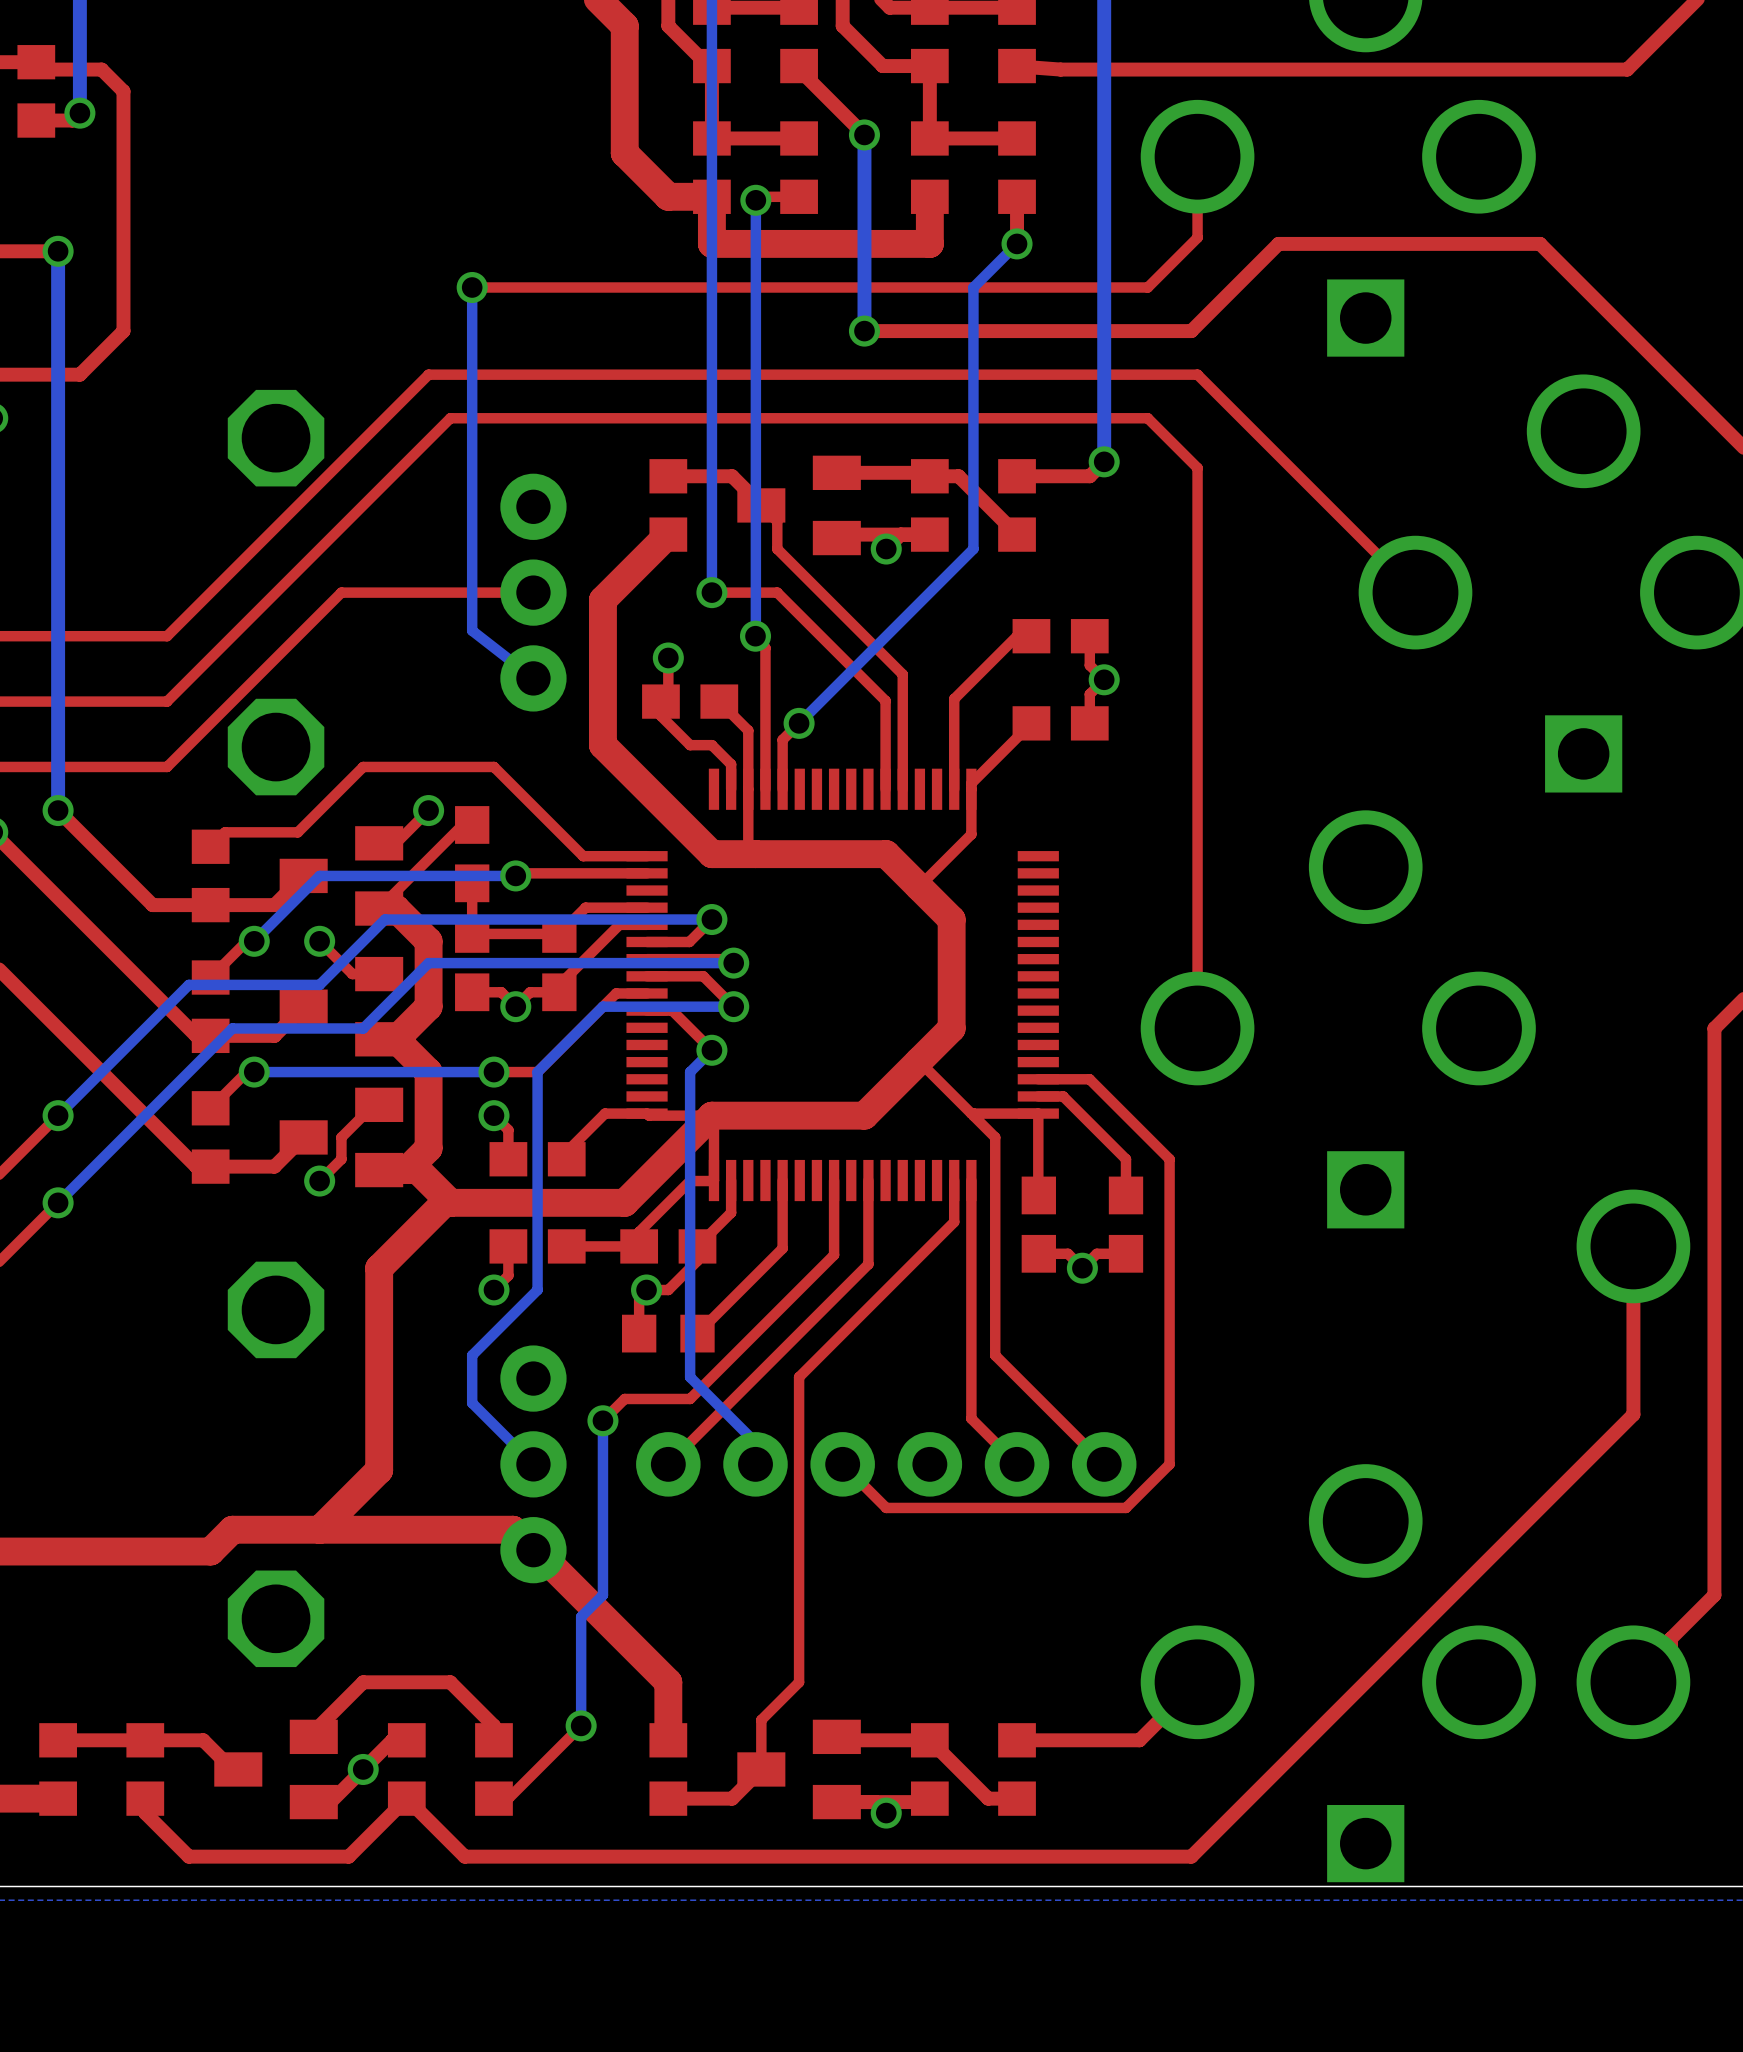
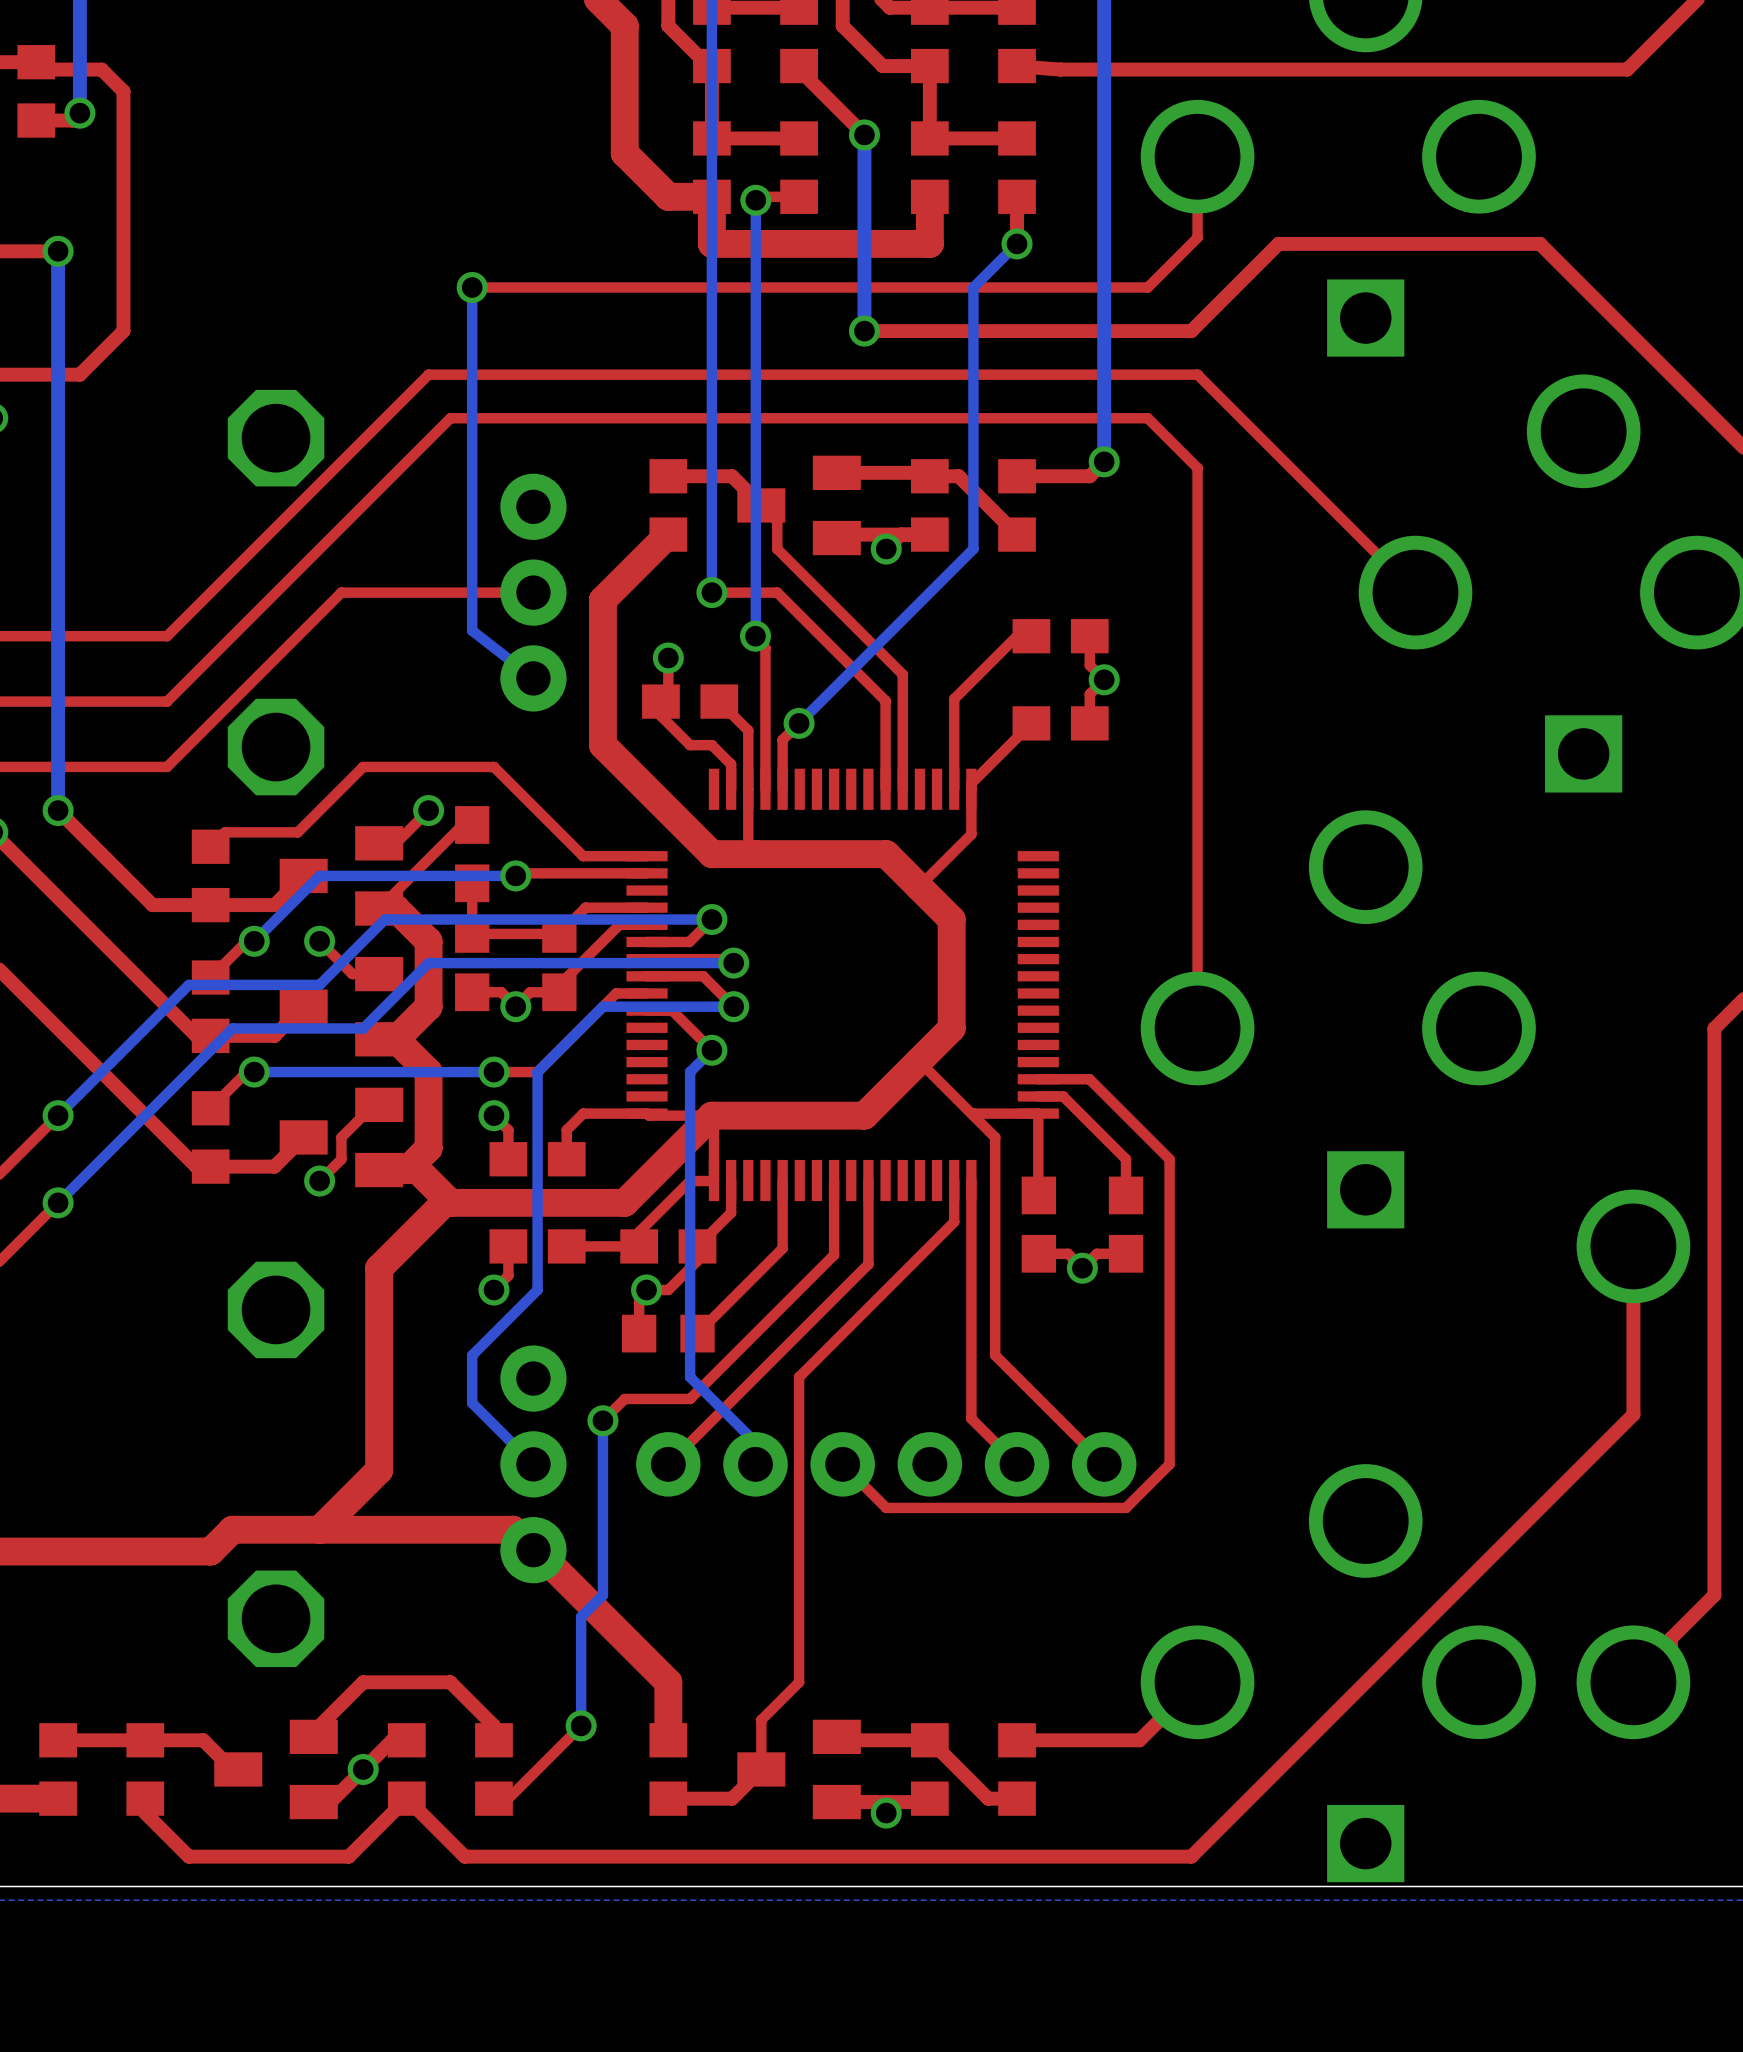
top track: (605, 1113) (566, 1151) -> (605, 1113) (583, 1113) (566, 1130) (566, 1151)

